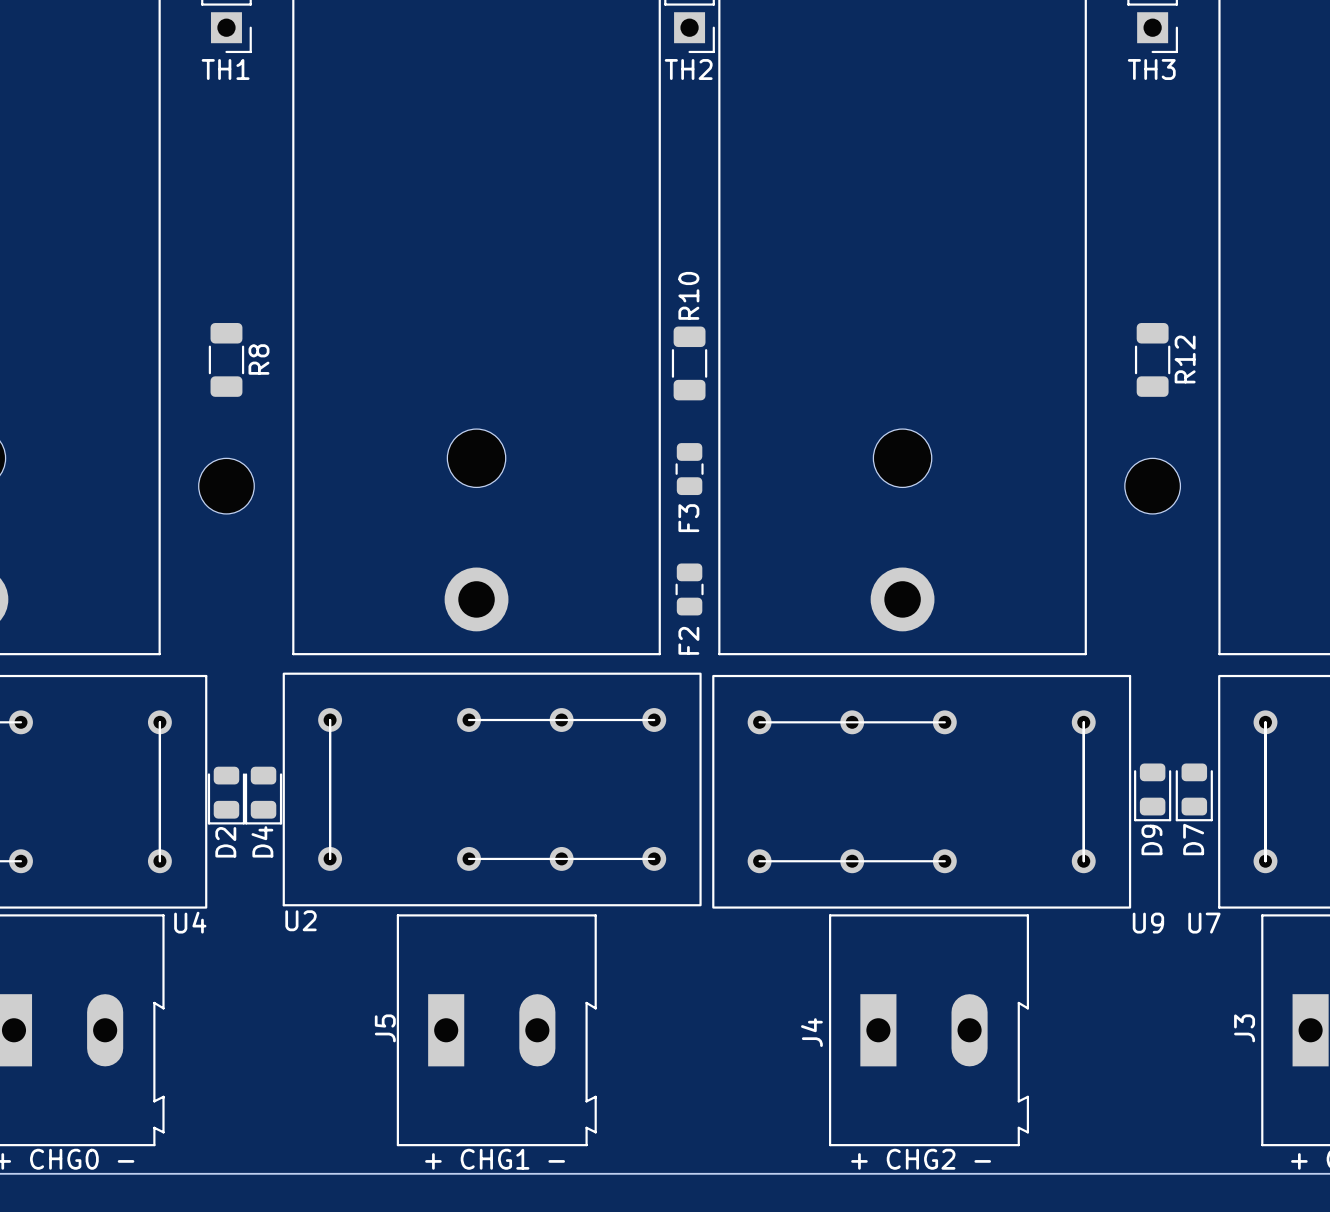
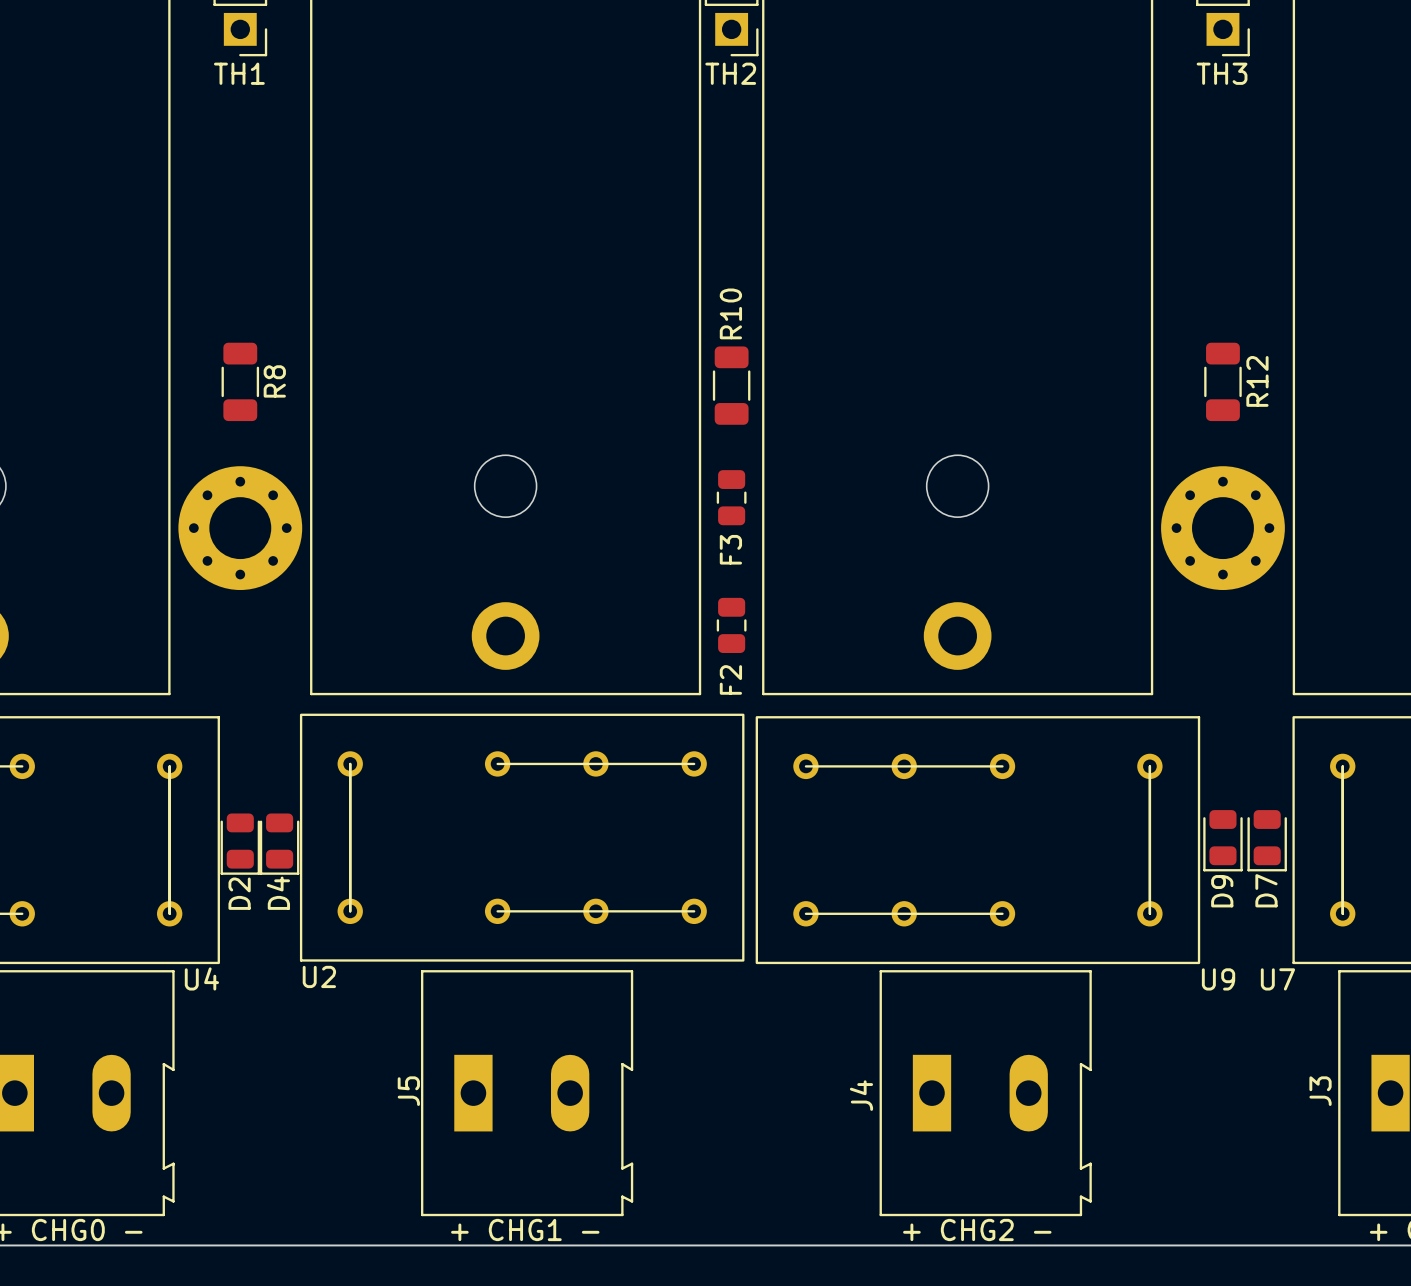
part footprint: [198, 458, 255, 514] -> [178, 466, 303, 591]
part footprint: [1124, 458, 1181, 514] -> [1161, 466, 1285, 591]

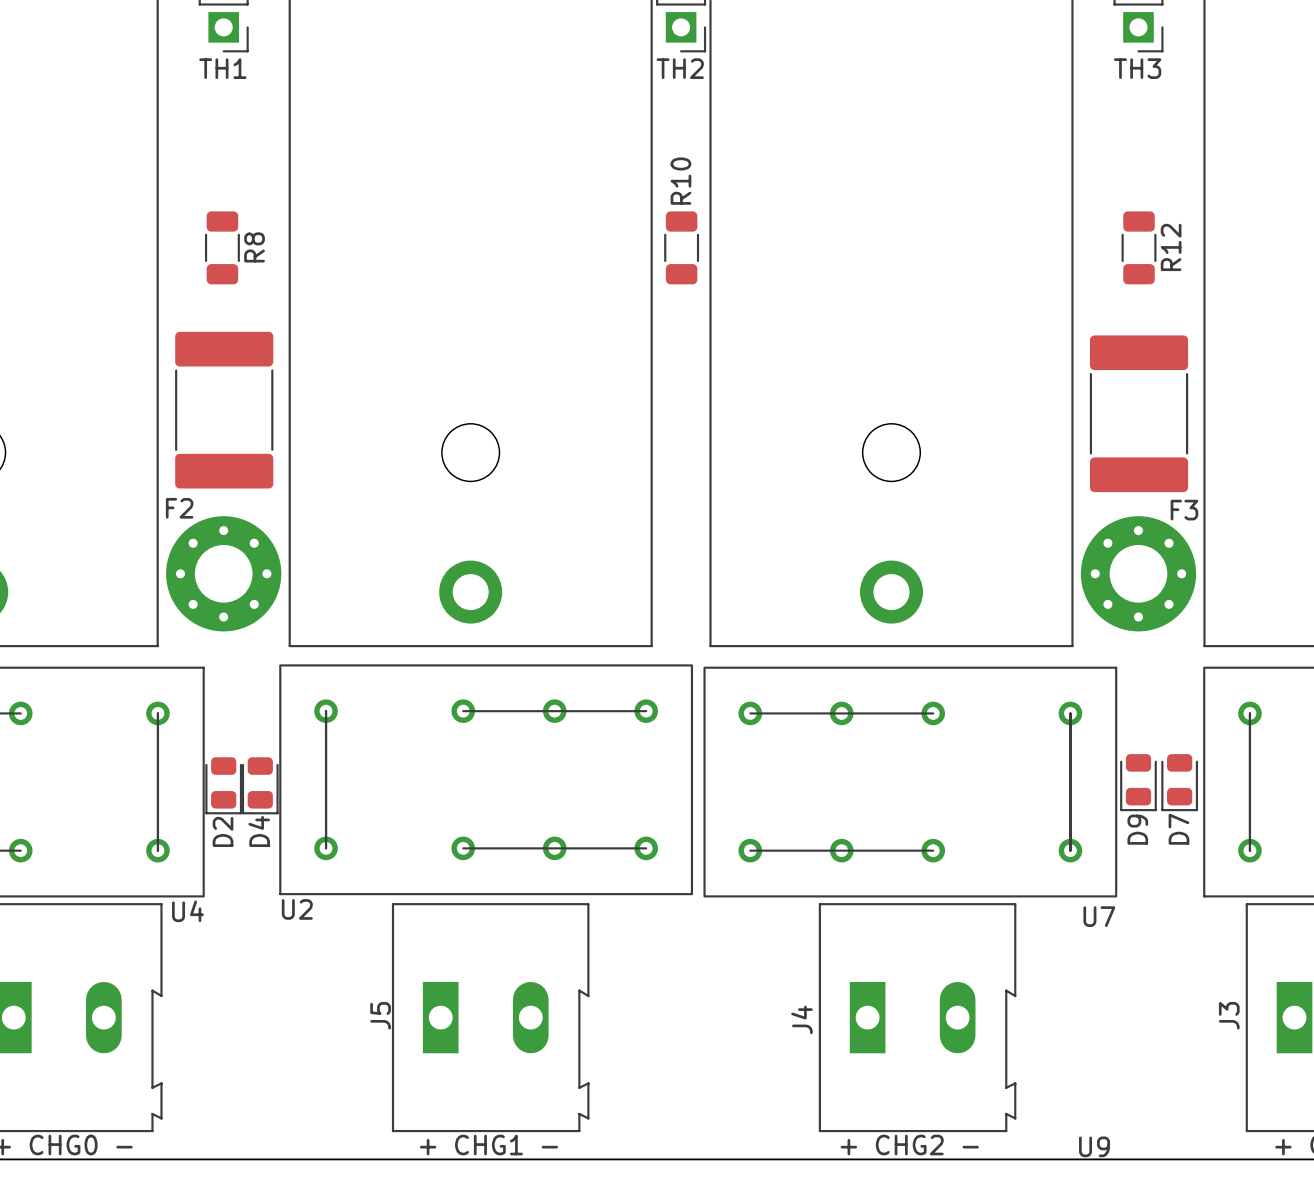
R8 position: (240, 381) -> (222, 247)
R12 position: (1222, 381) -> (1139, 247)
R10 position: (731, 385) -> (681, 247)
F3 footprint: [716, 470, 747, 526] -> [1089, 335, 1189, 493]
part position: (240, 528) -> (223, 573)
part position: (1222, 528) -> (1138, 573)
F3 name position: F3 (730, 549) -> F3 (1184, 510)
F2 footprint: [716, 597, 747, 653] -> [175, 331, 274, 489]
F2 name position: F2 (730, 679) -> F2 (179, 508)
U9 name position: U9 (1218, 979) -> U9 (1094, 1146)
U7 name position: U7 (1277, 979) -> U7 (1099, 916)

